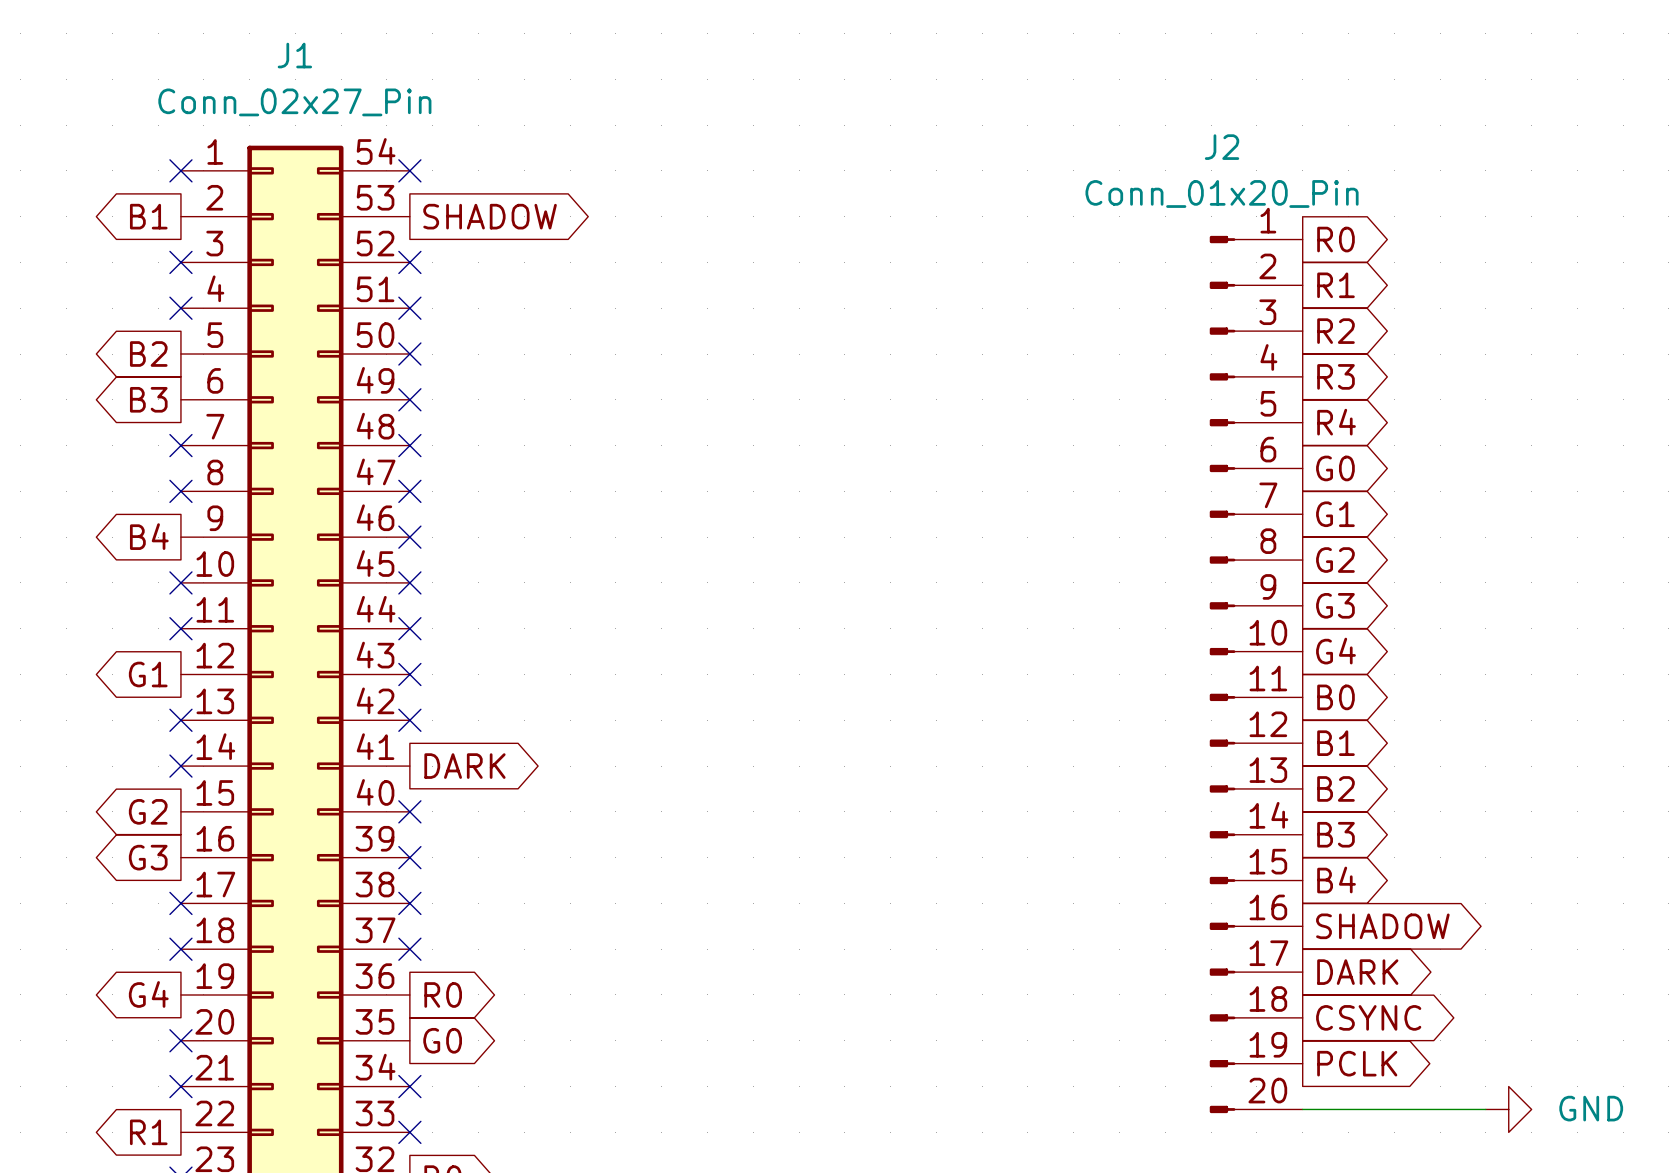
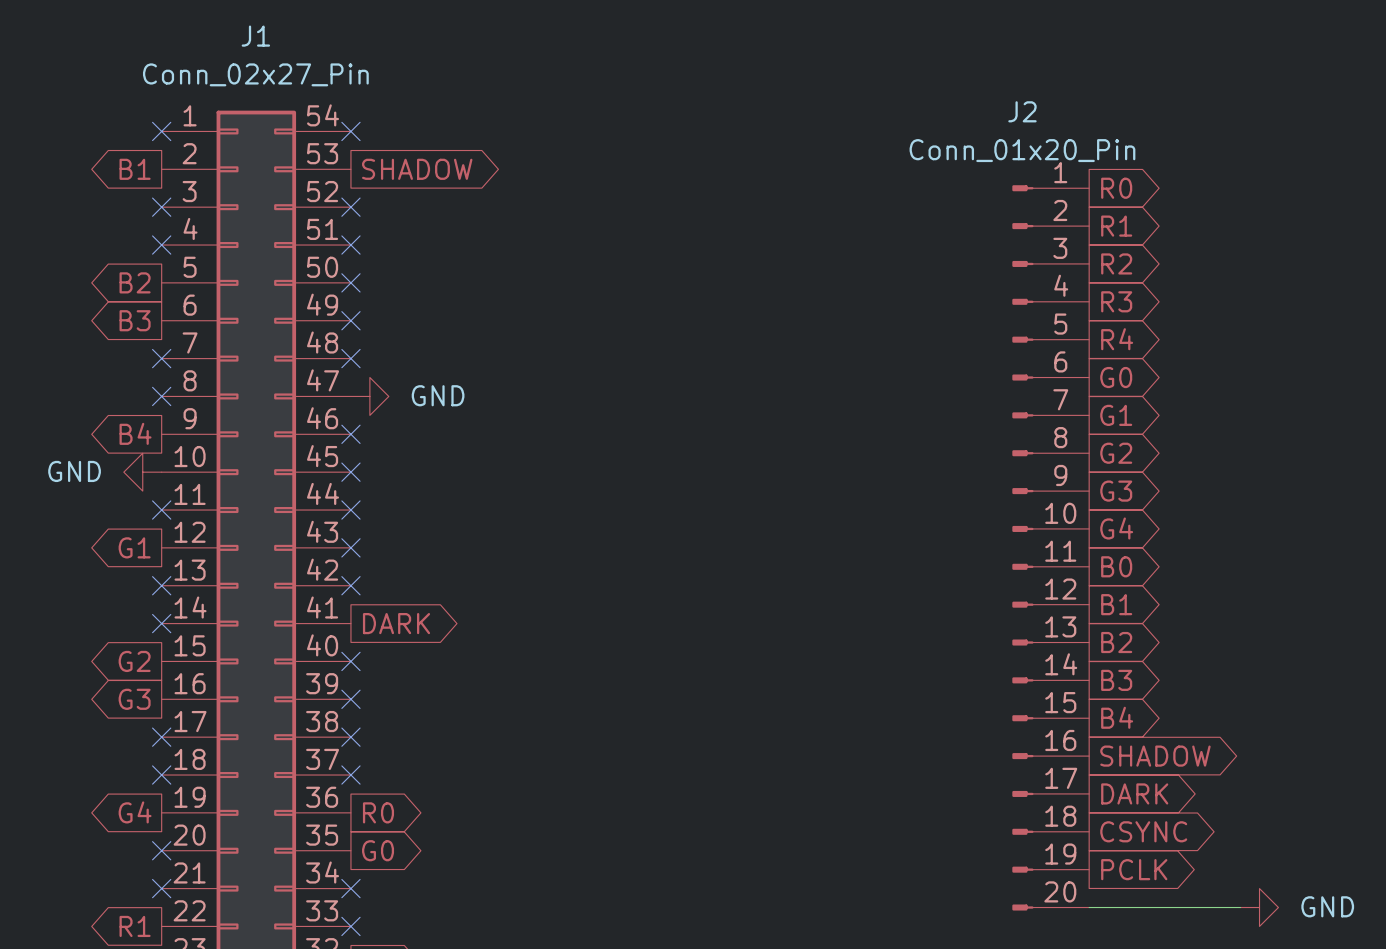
no-connect mark: (409, 491) -> none
power symbol: none -> GND (369, 396)
power symbol: none -> GND (142, 472)
no-connect mark: (180, 582) -> none

